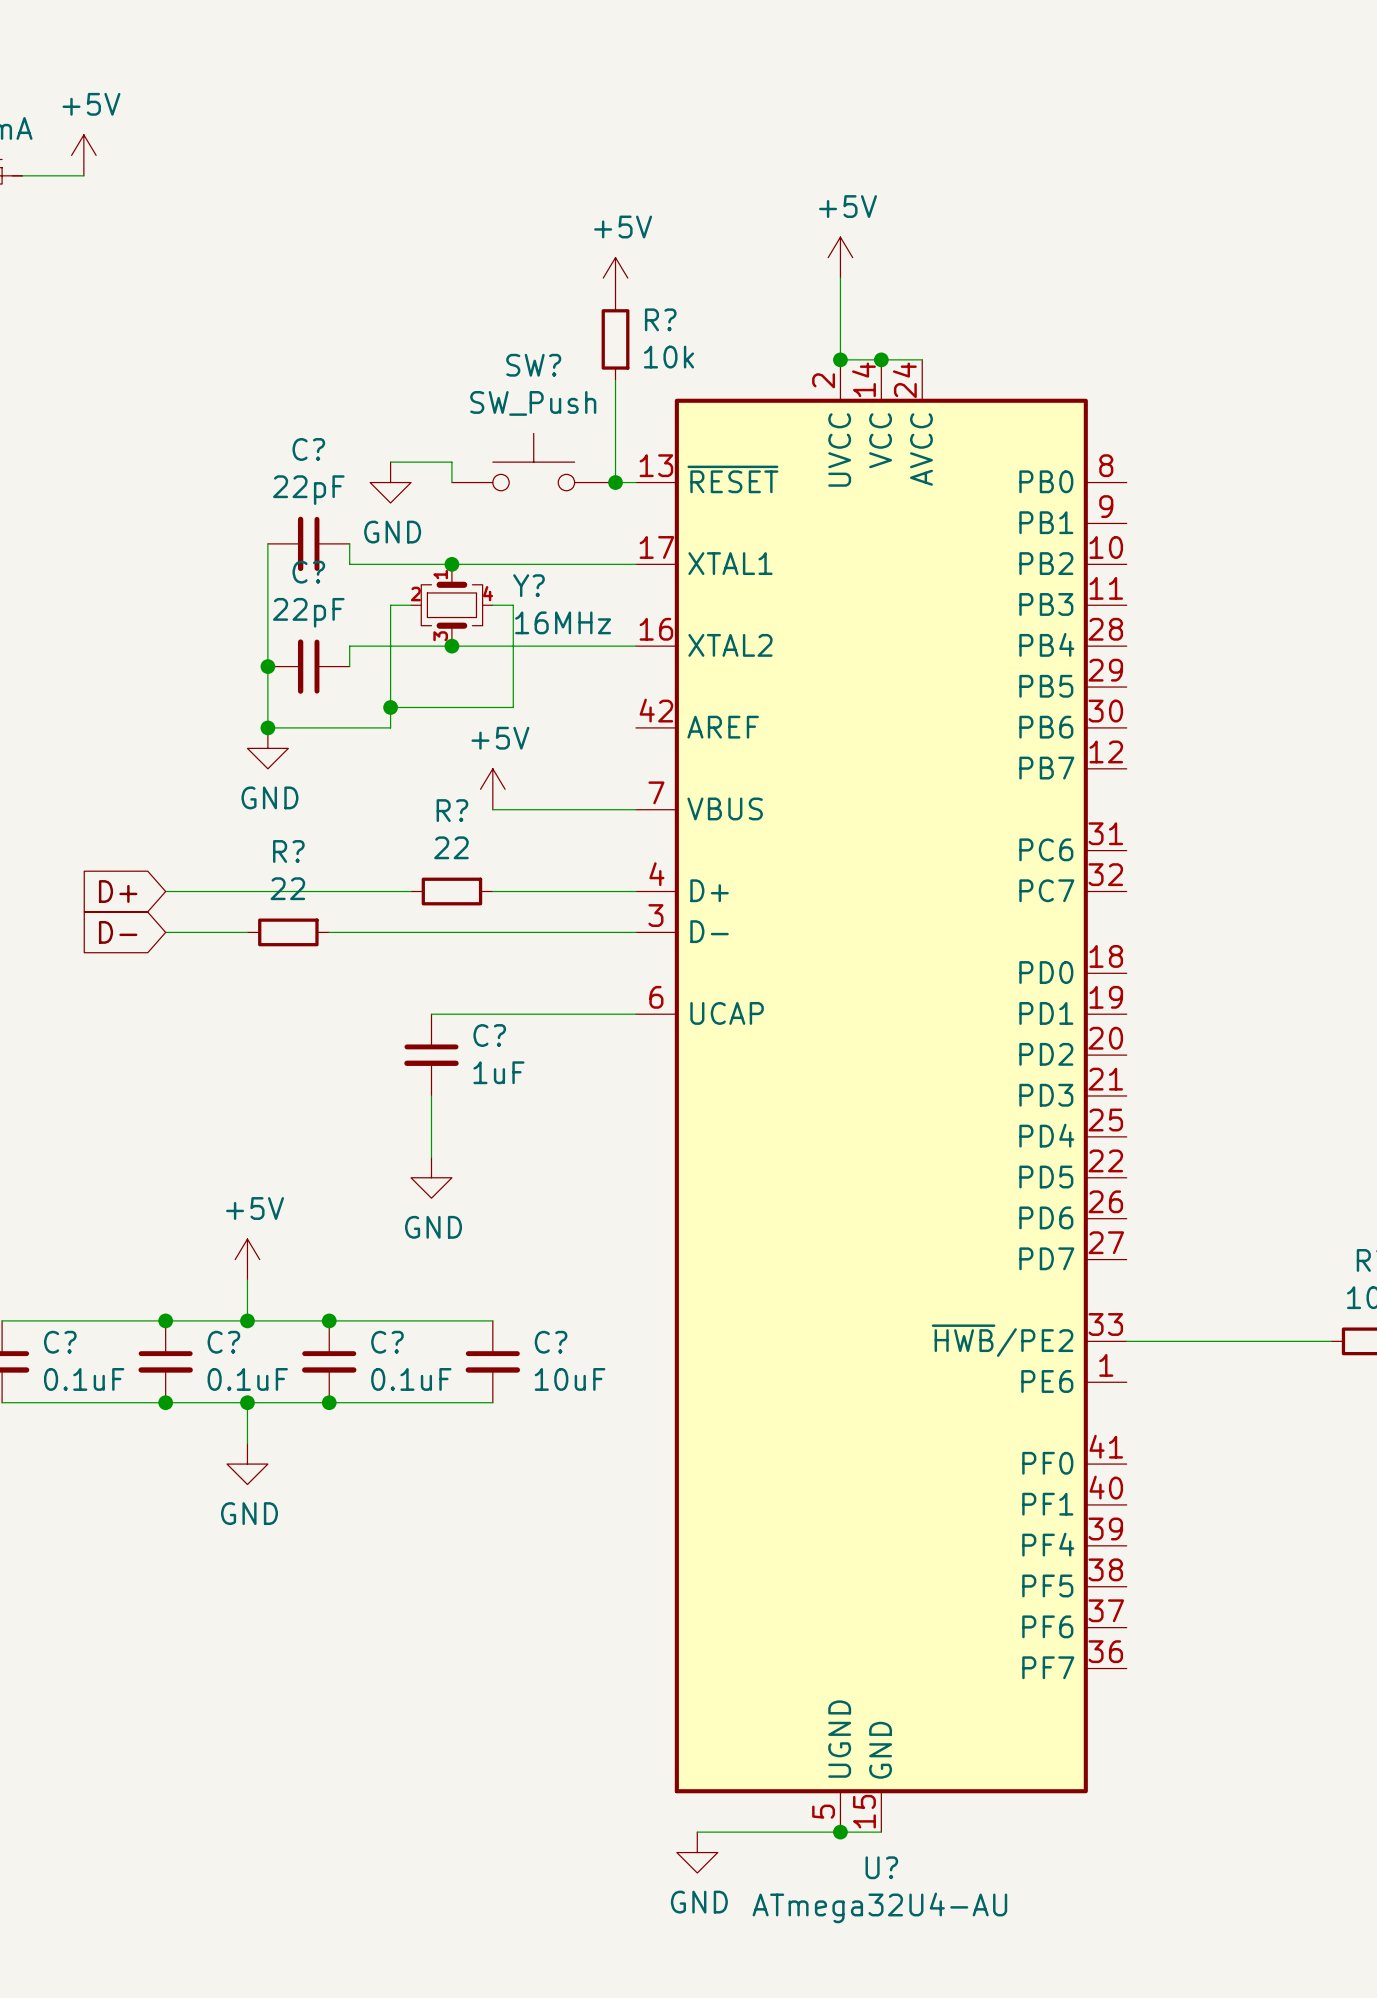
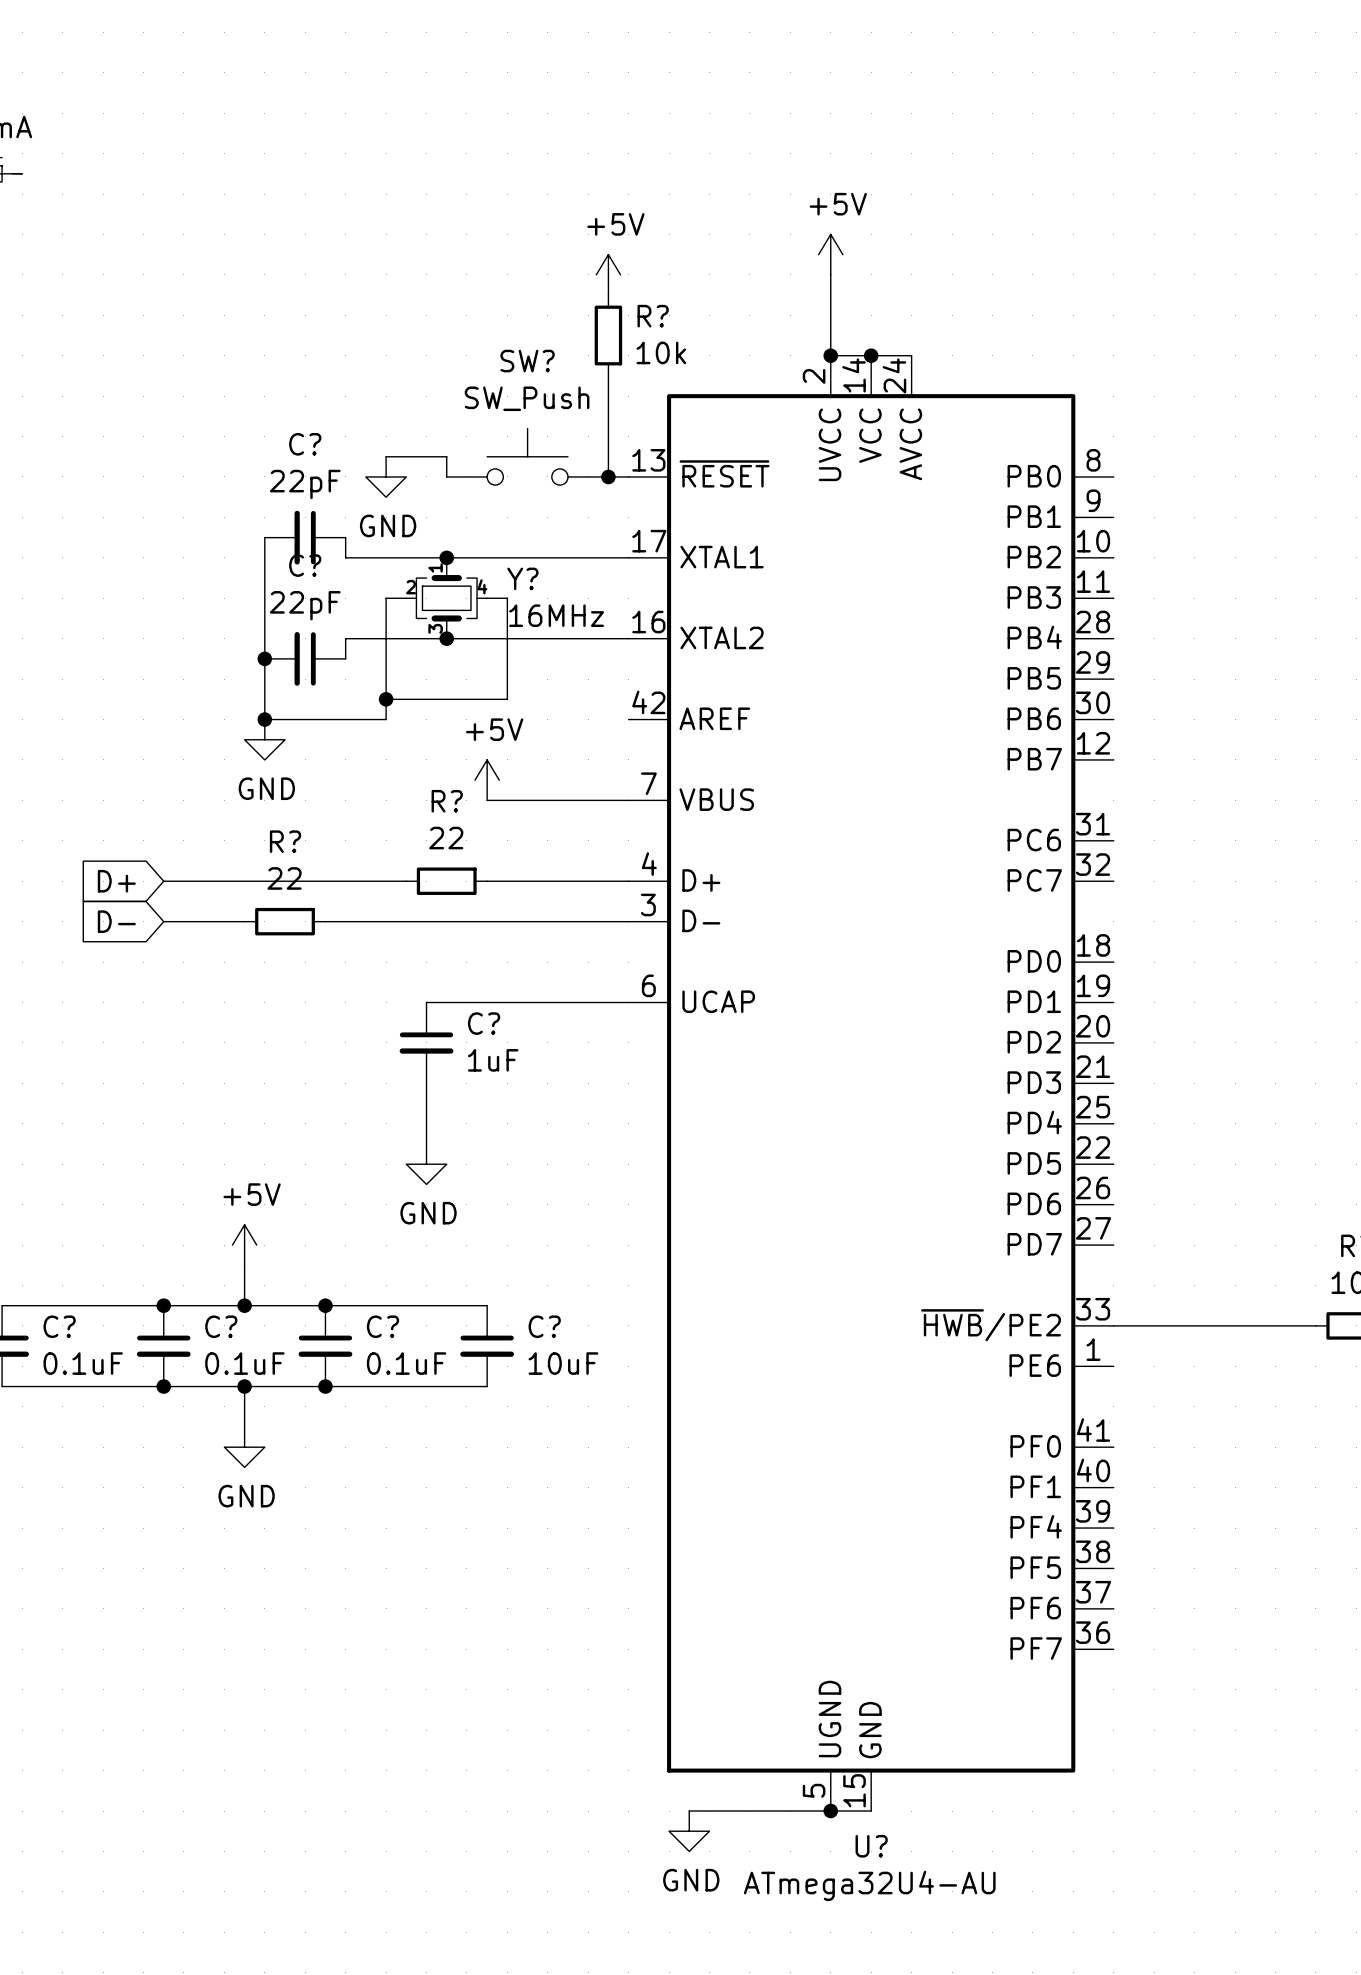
power symbol: +5V (83, 155) -> none
wire: (22, 175) (83, 175) -> none

